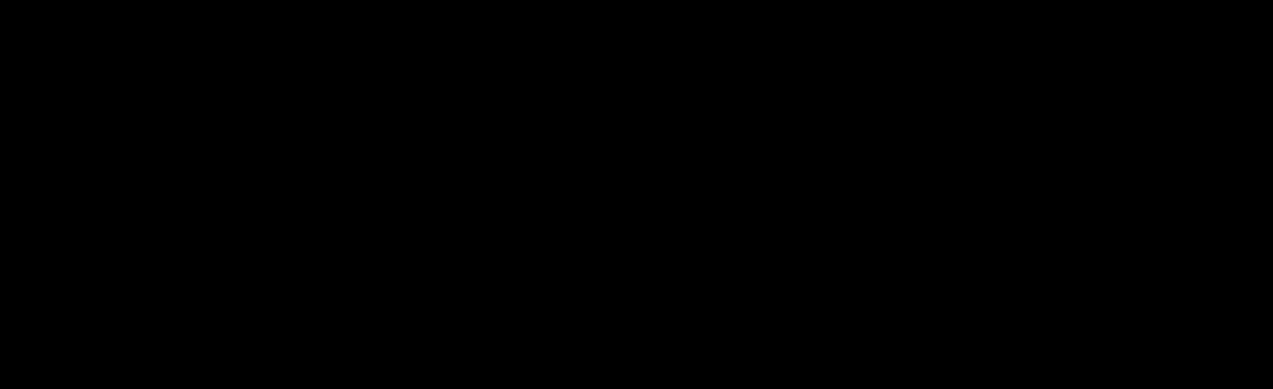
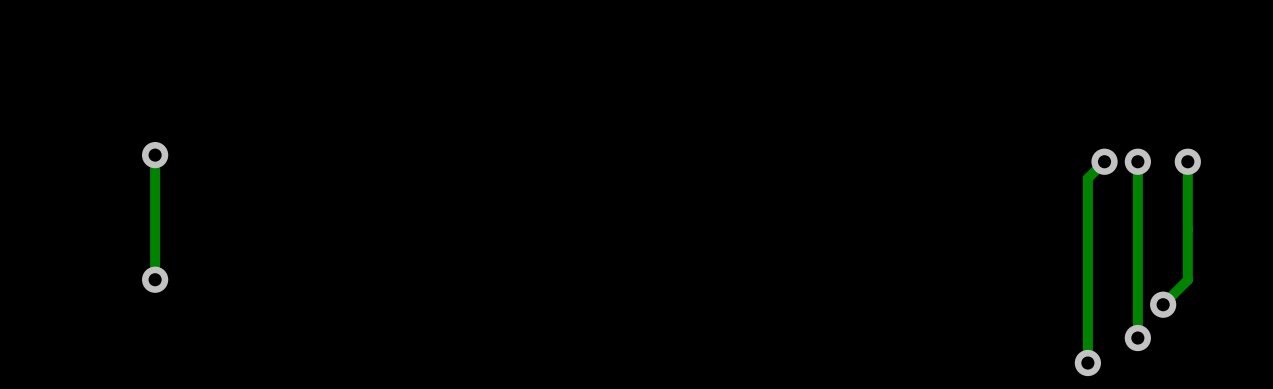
track: none -> (155, 155) (155, 279)
via: none -> (155, 155)
track: none -> (1104, 161) (1087, 178) (1087, 363)
via: none -> (1104, 161)
track: none -> (1137, 161) (1137, 338)
via: none -> (1137, 161)
track: none -> (1187, 161) (1187, 280) (1163, 304)
via: none -> (1187, 161)
via: none -> (155, 279)
via: none -> (1163, 304)
via: none -> (1137, 338)
via: none -> (1087, 363)

